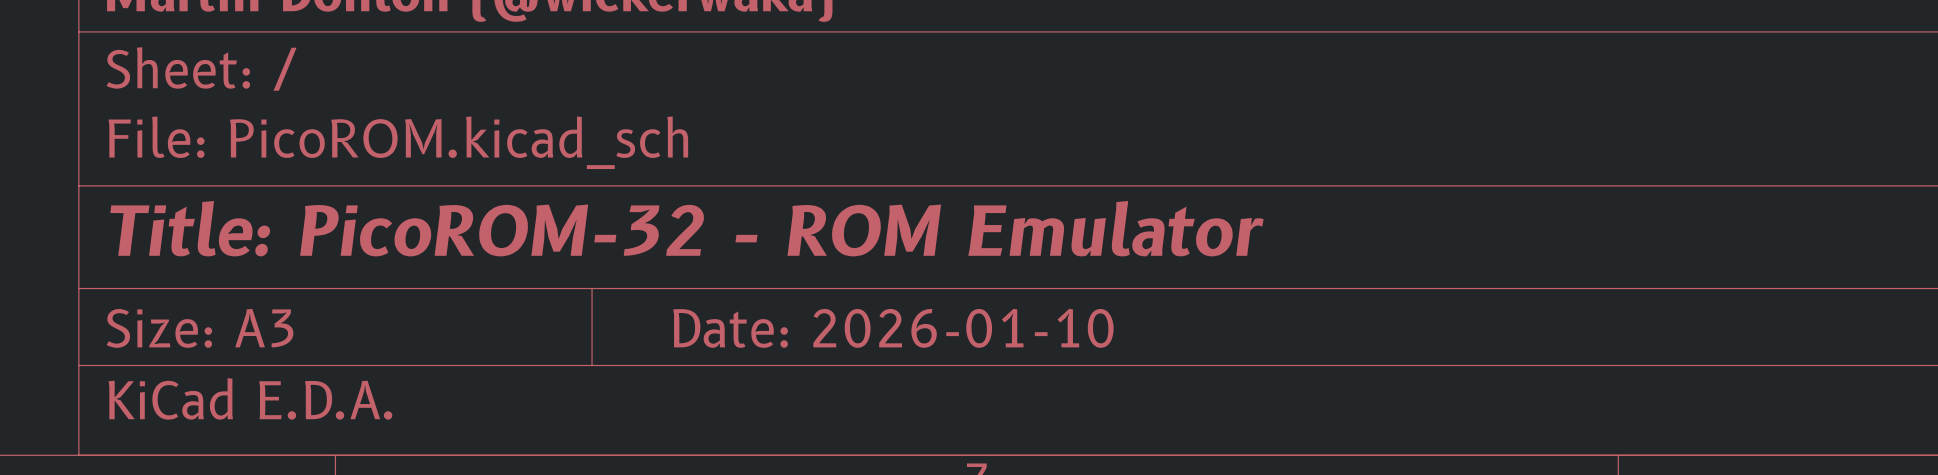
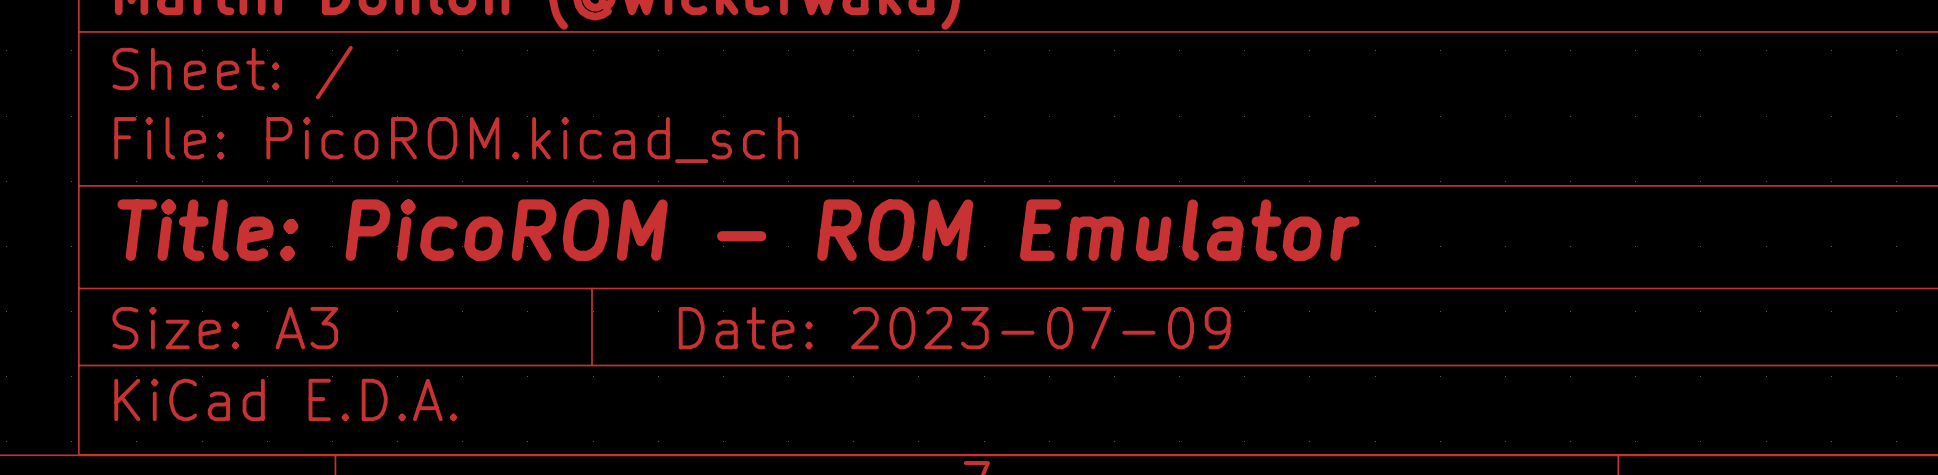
title block: Title: PicoROM-32 - ROM Emulator (686, 228) -> Title: PicoROM - ROM Emulator (738, 230)
title block: Date: 2026-01-10 (893, 328) -> Date: 2023-07-09 (954, 328)

